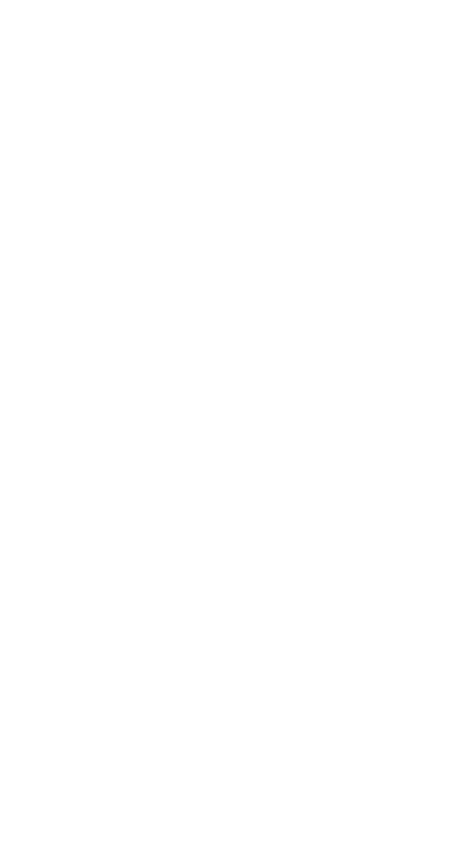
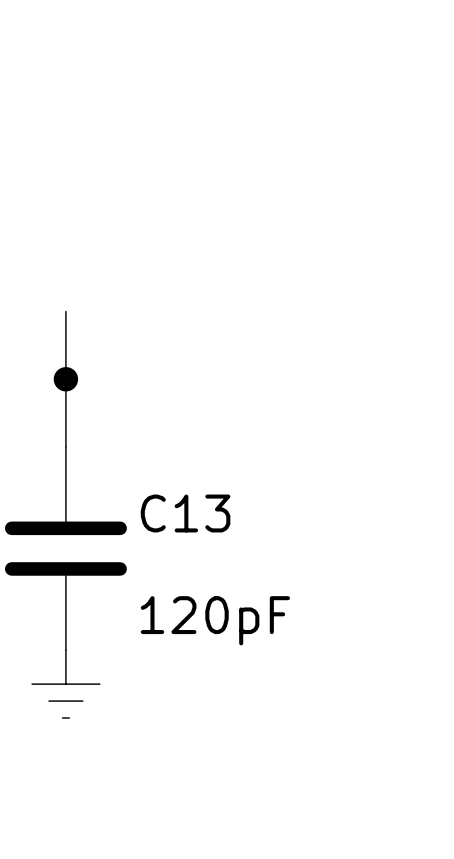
wire: none -> (65, 311) (65, 447)
junction: none -> (65, 379)
C13: none -> 120pF (65, 548)
power symbol: none -> (65, 684)

